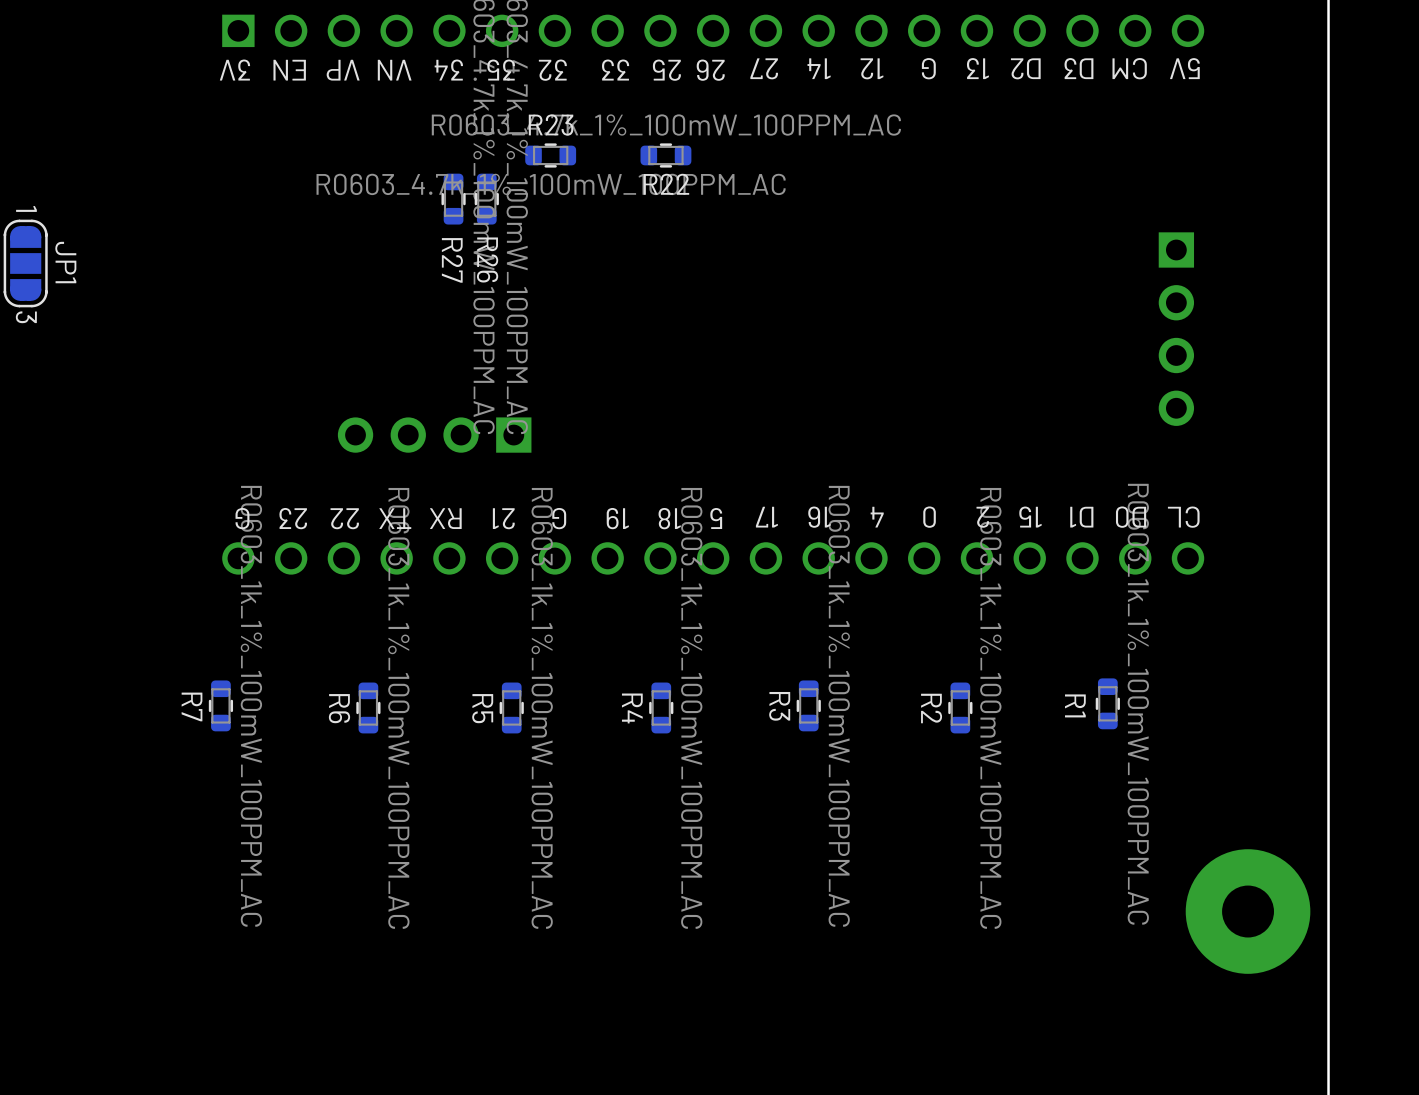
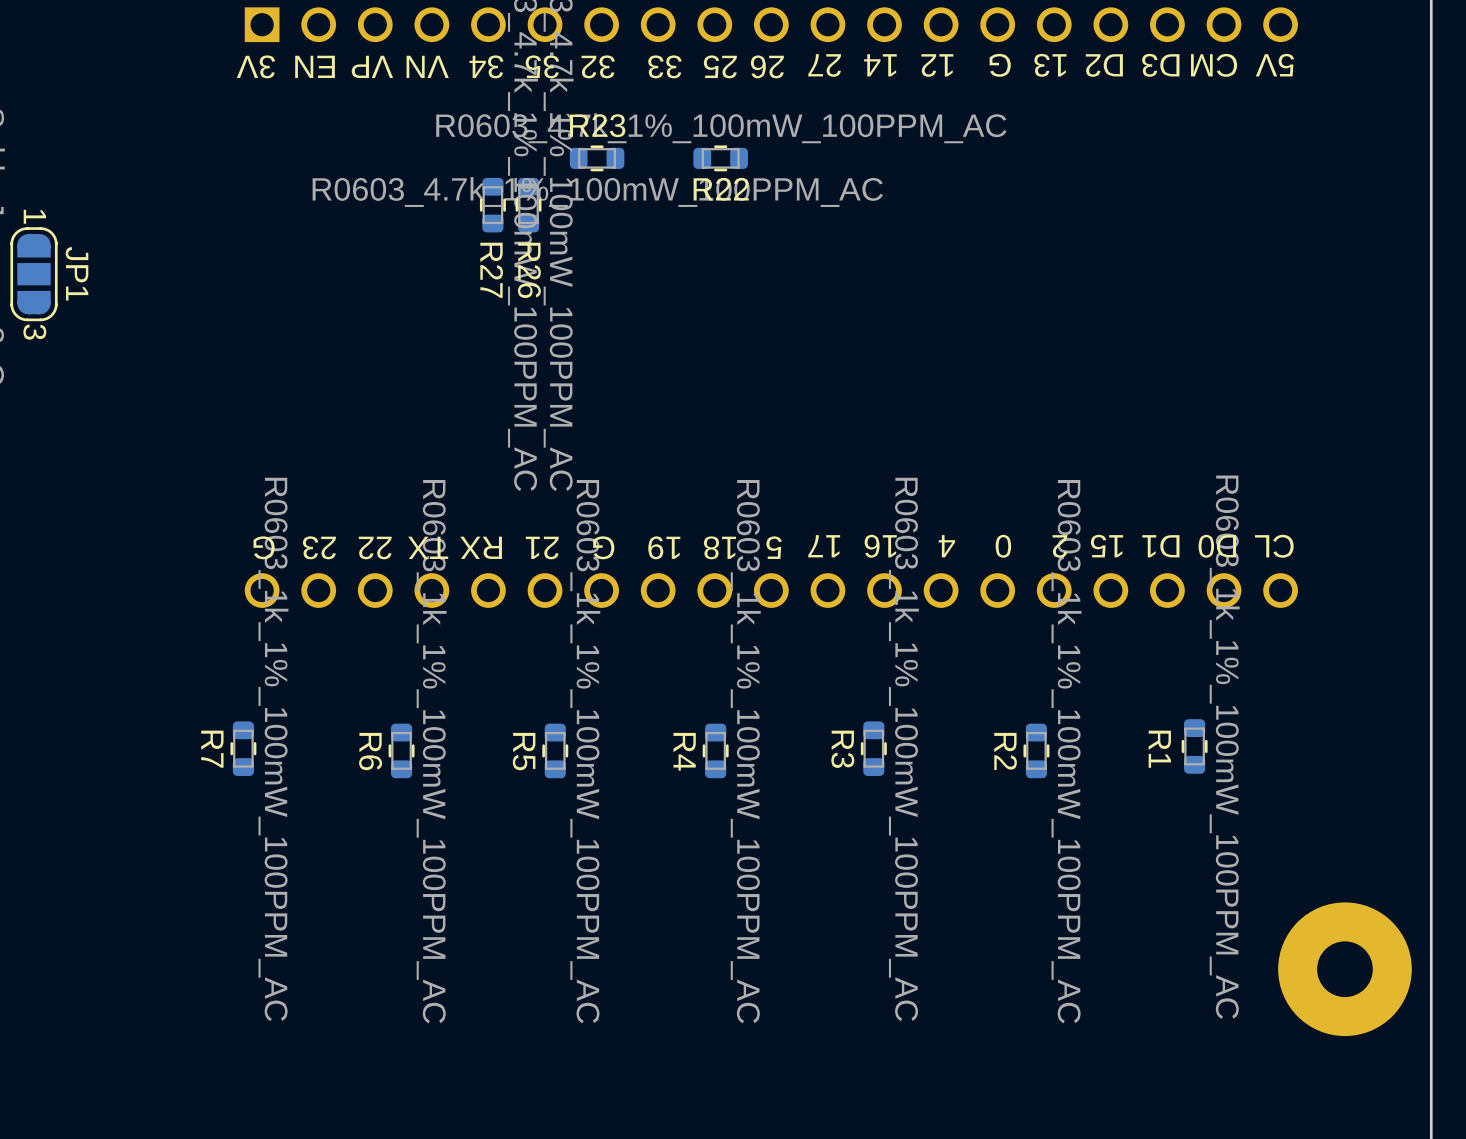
part: (1176, 329) -> none
part: (434, 435) -> none

